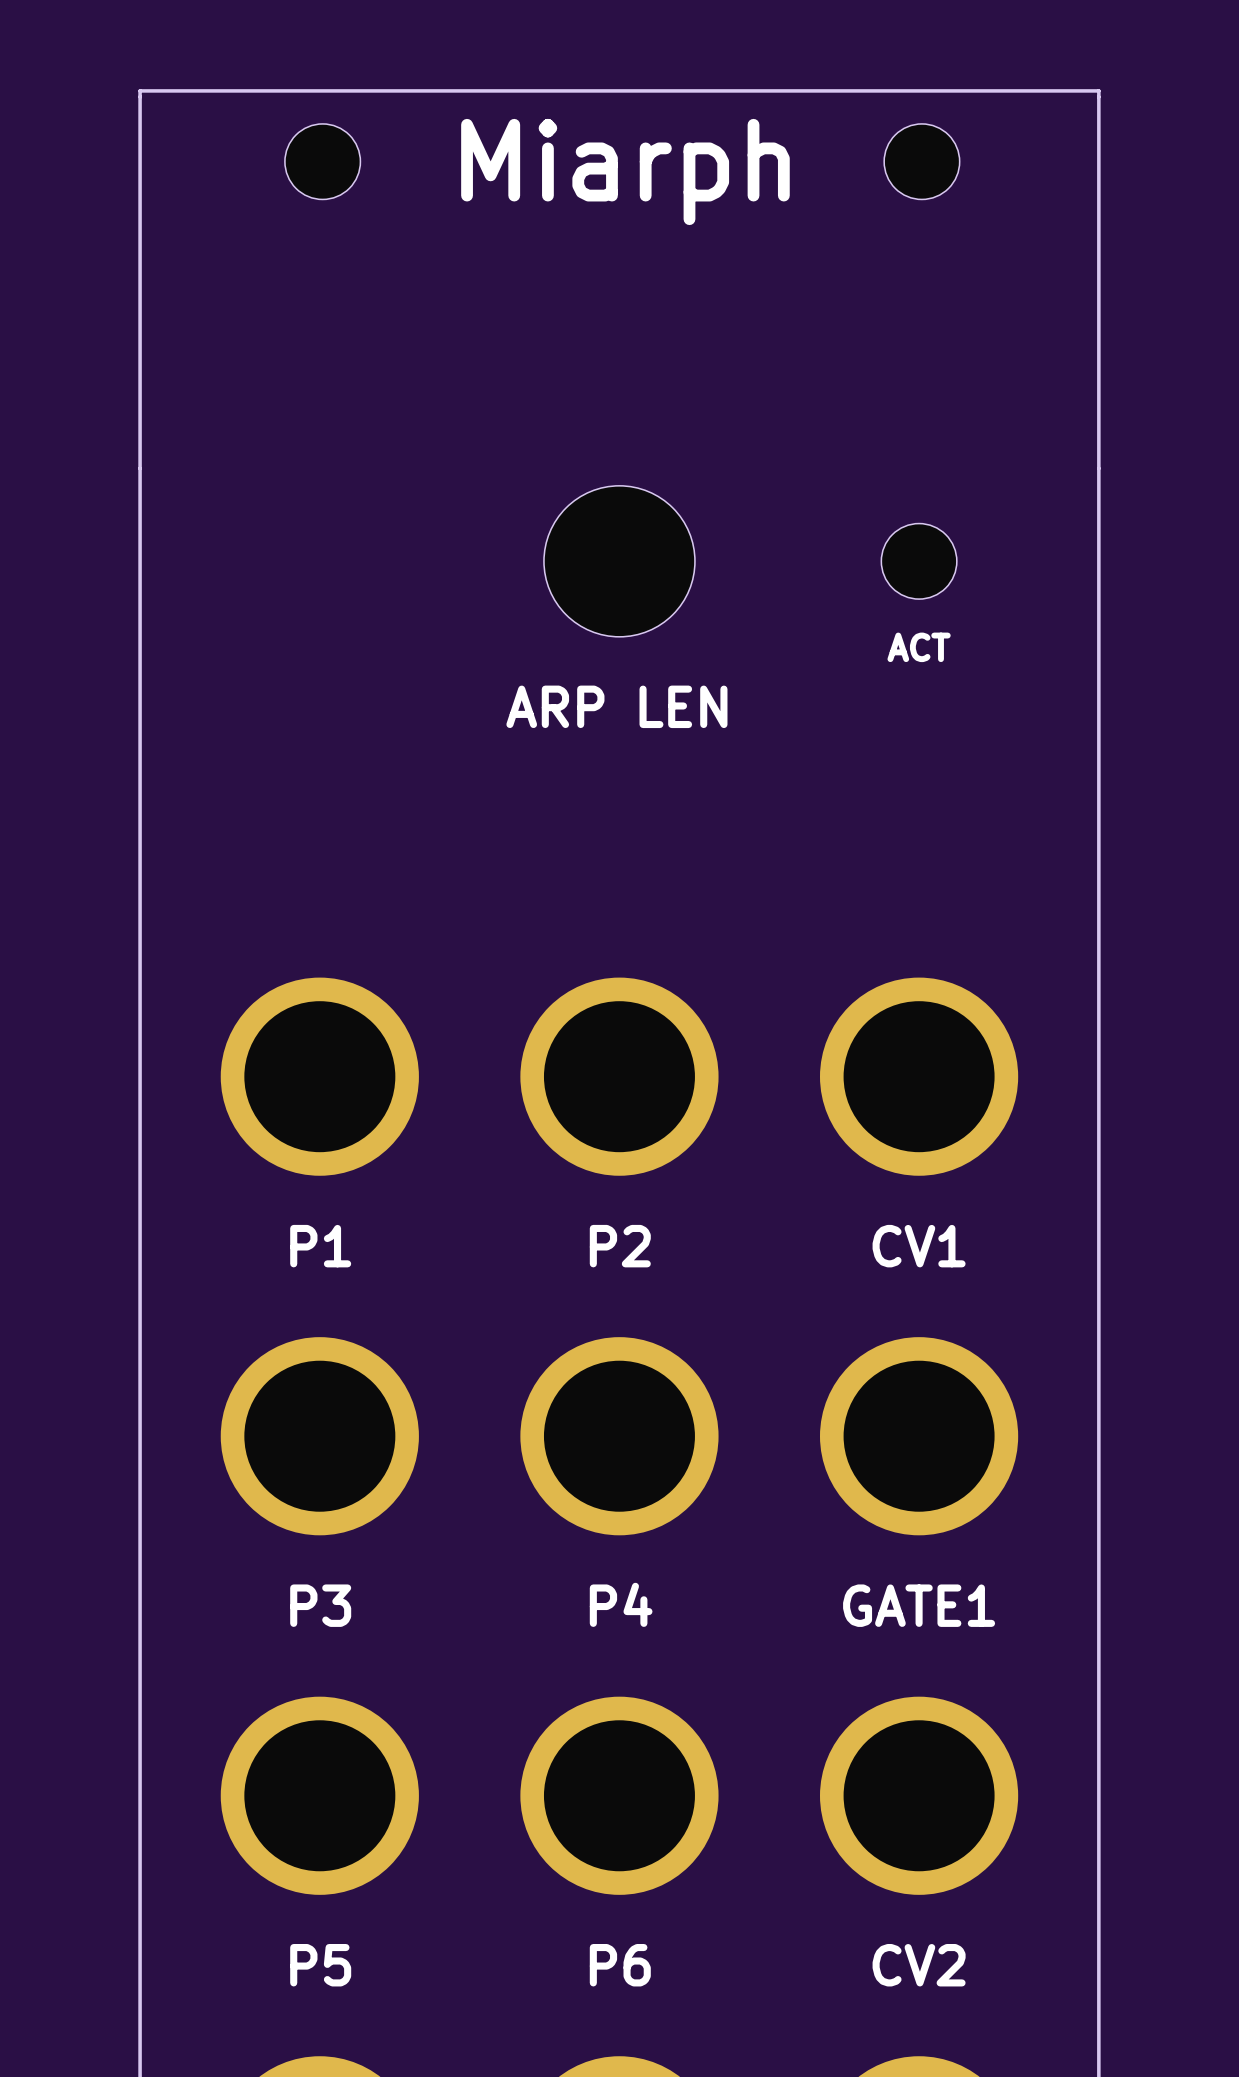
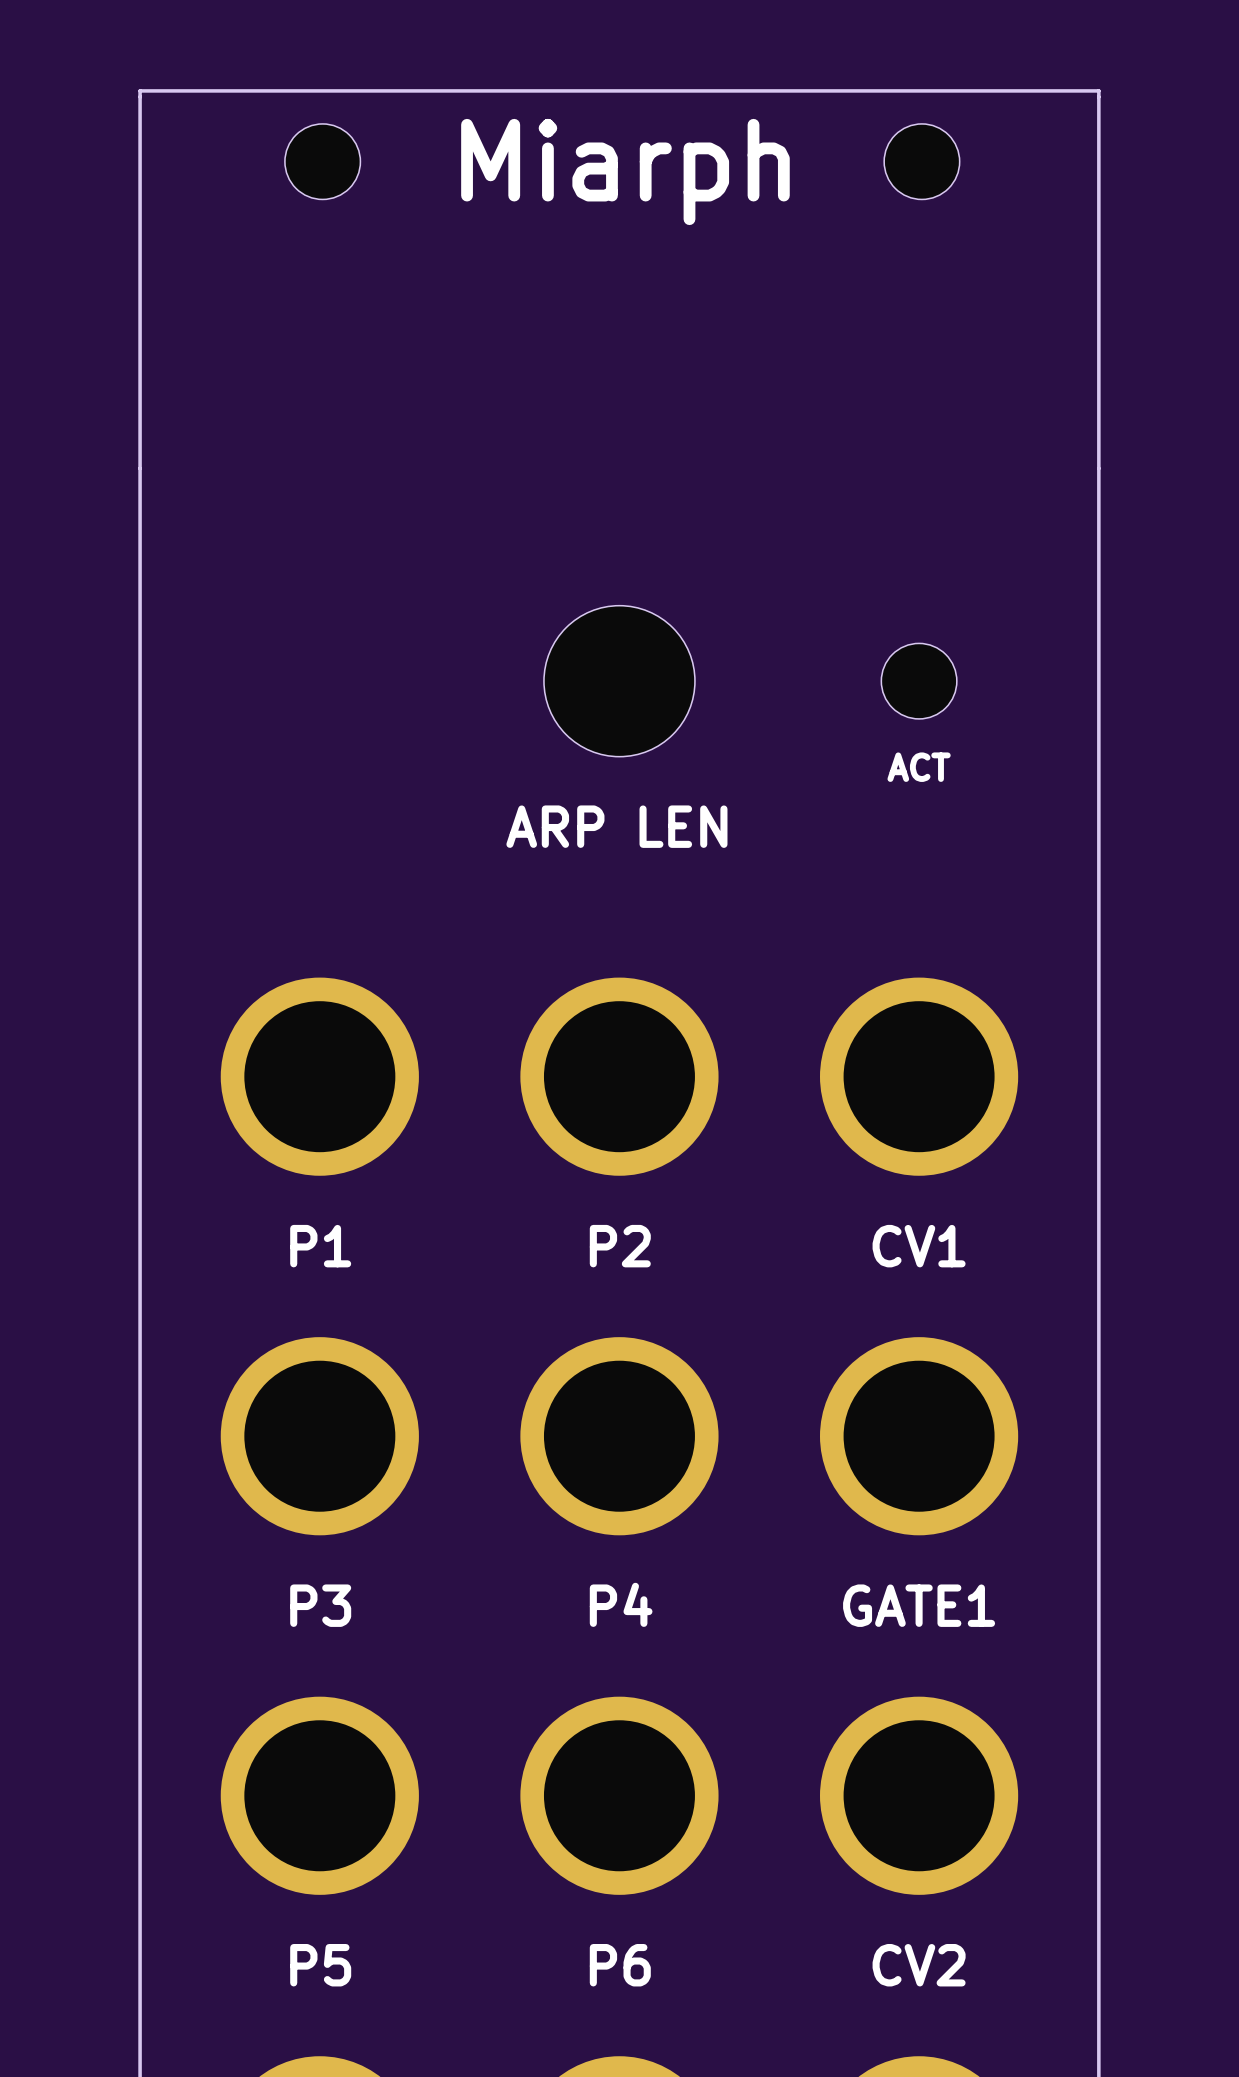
part position: (619, 561) -> (619, 681)
part position: (919, 561) -> (919, 681)
text position: ACT (919, 647) -> ACT (919, 767)
text position: ARP LEN (616, 706) -> ARP LEN (616, 826)

